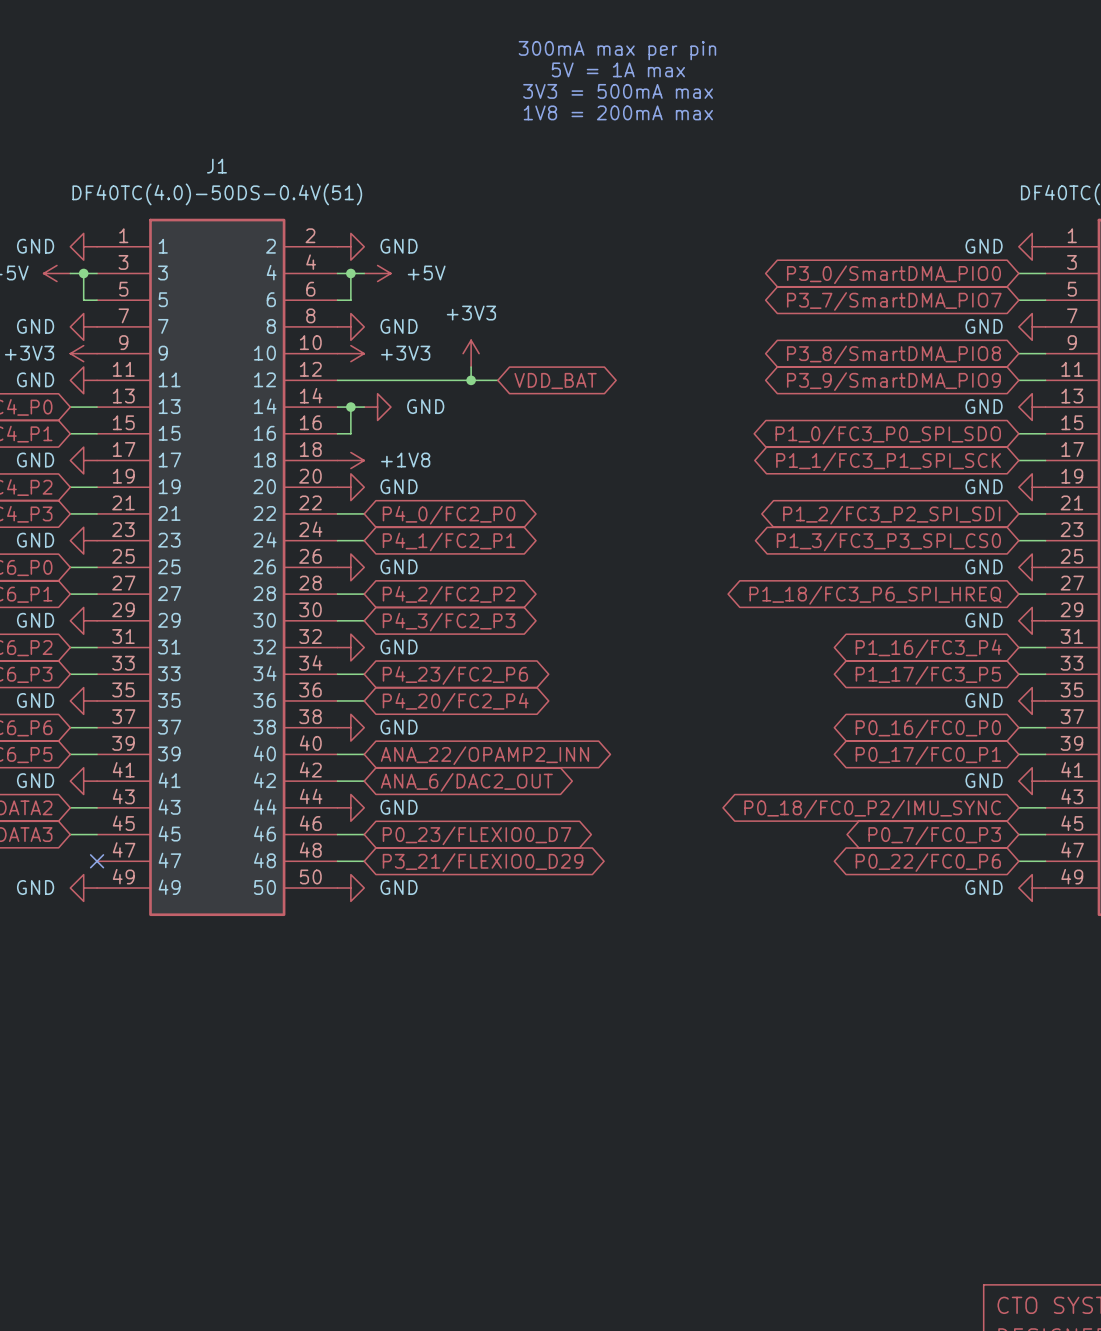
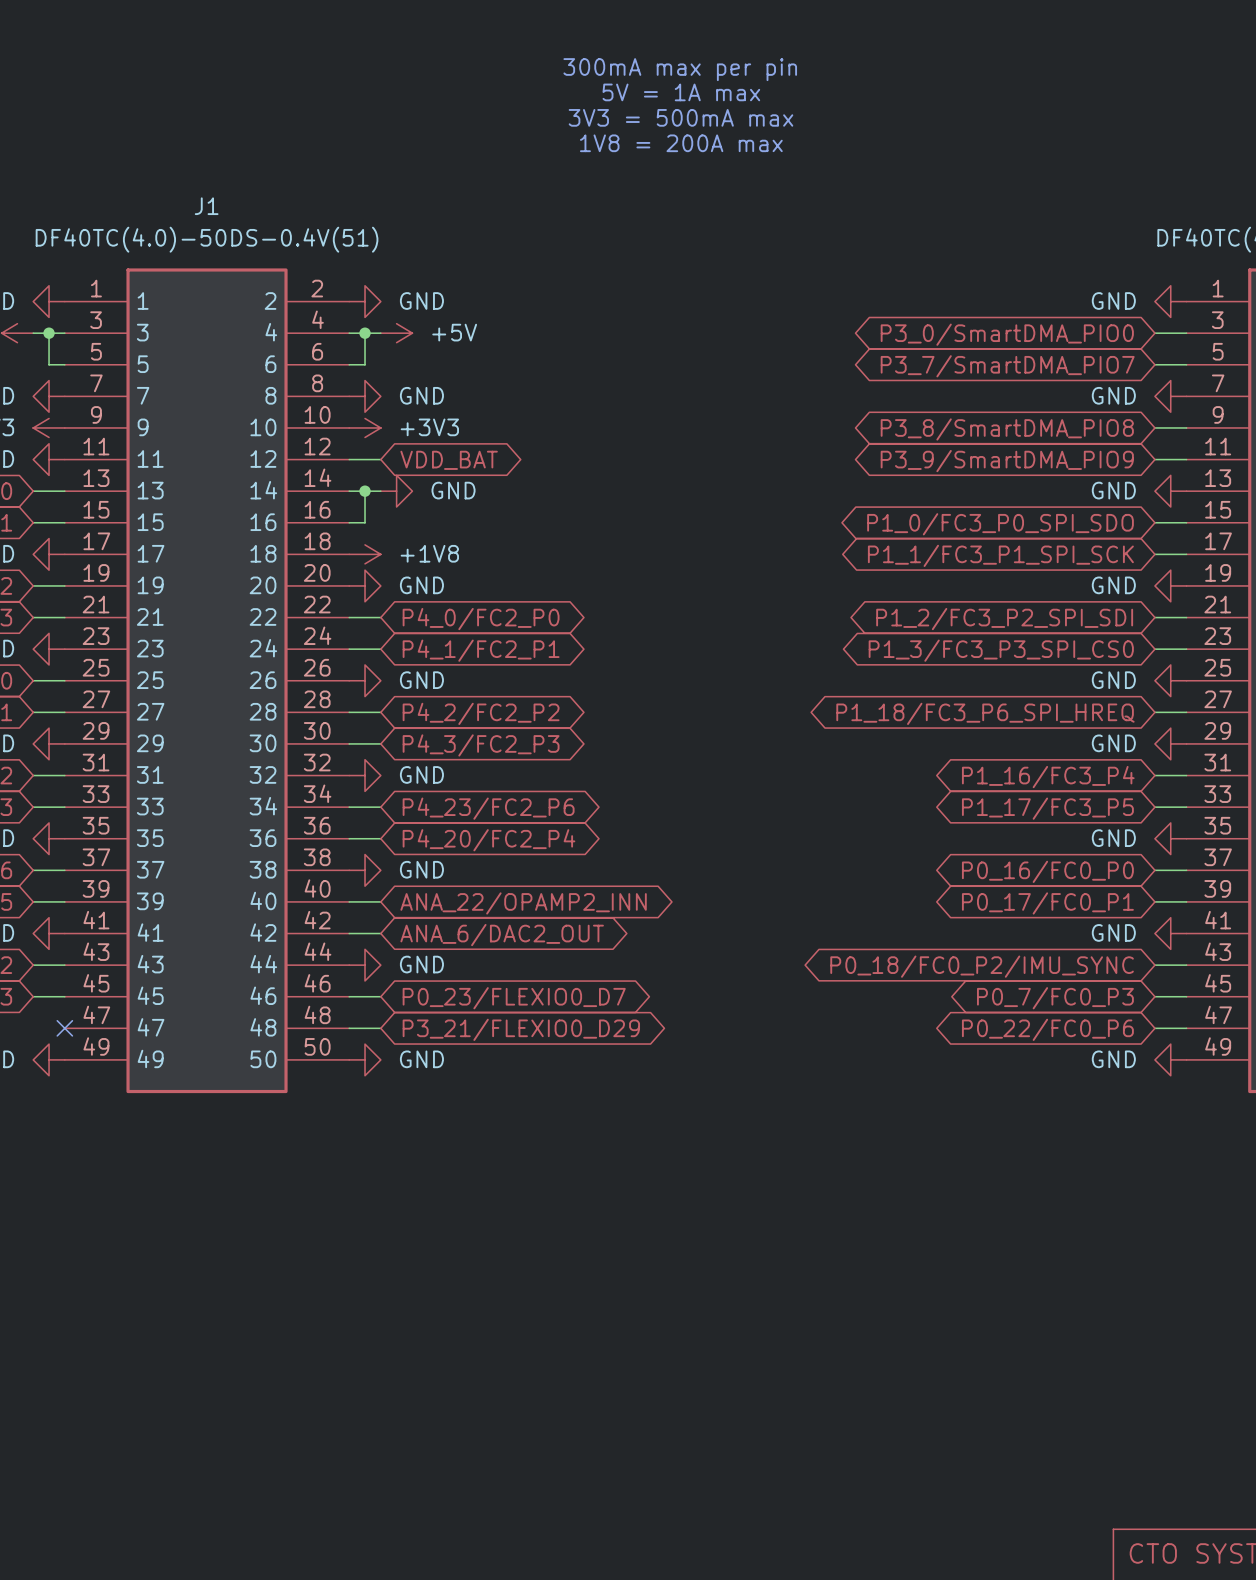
text: 1V8 = 200mA max (618, 112) -> 1V8 = 200A max (681, 143)
power symbol: +3V3 (471, 353) -> none
wire: (471, 367) (471, 380) -> none
wire: (364, 380) (497, 380) -> none
junction: (471, 380) -> none
global label position: VDD_BAT (555, 380) -> VDD_BAT (449, 460)

